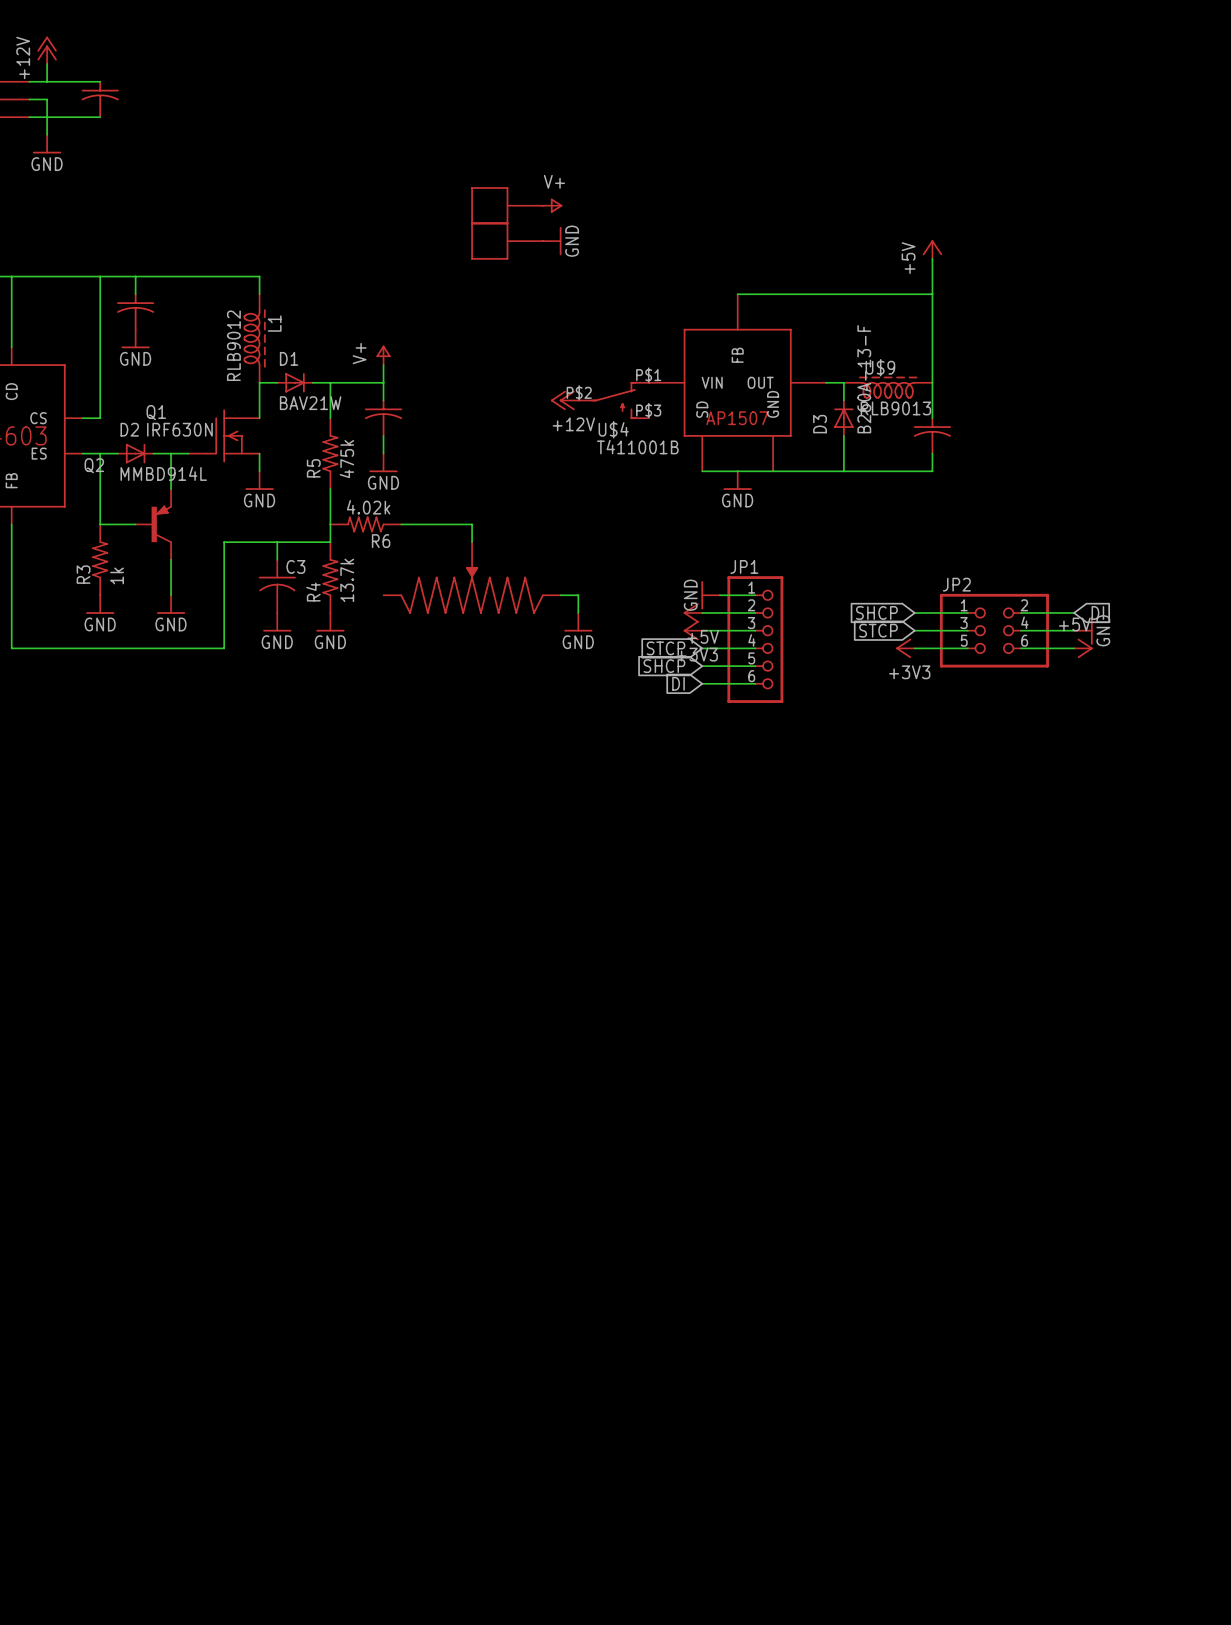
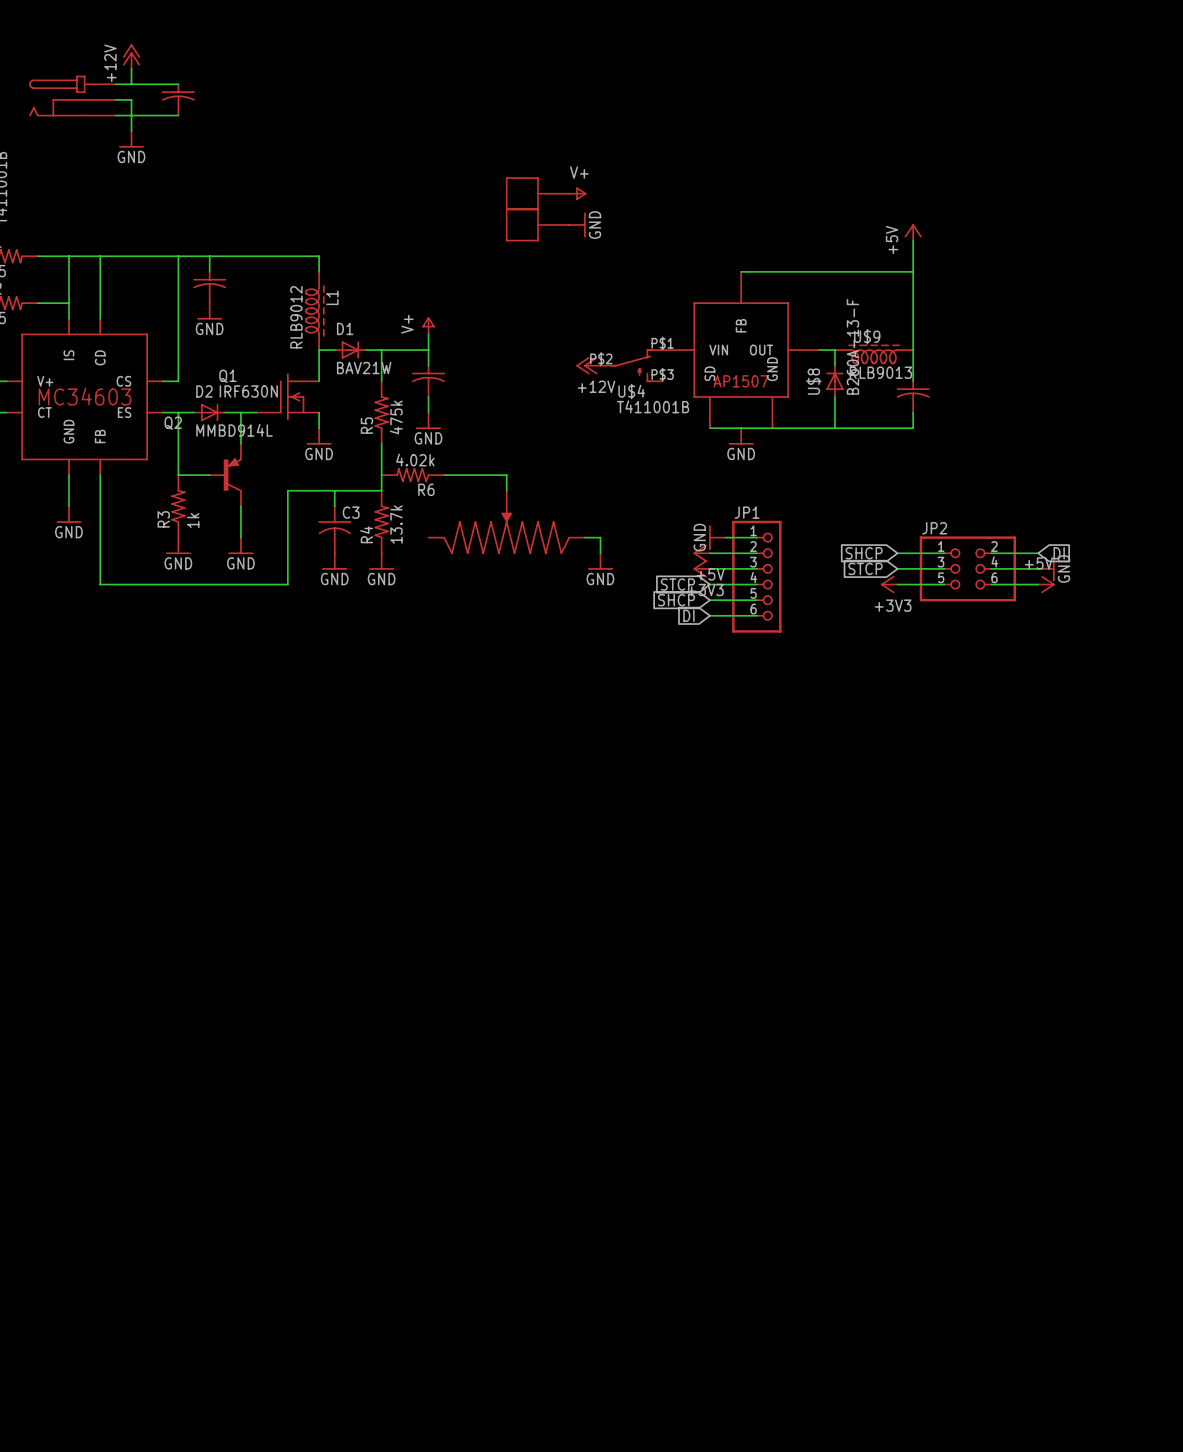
D3 name: D3 (820, 424) -> U$8 (813, 381)

